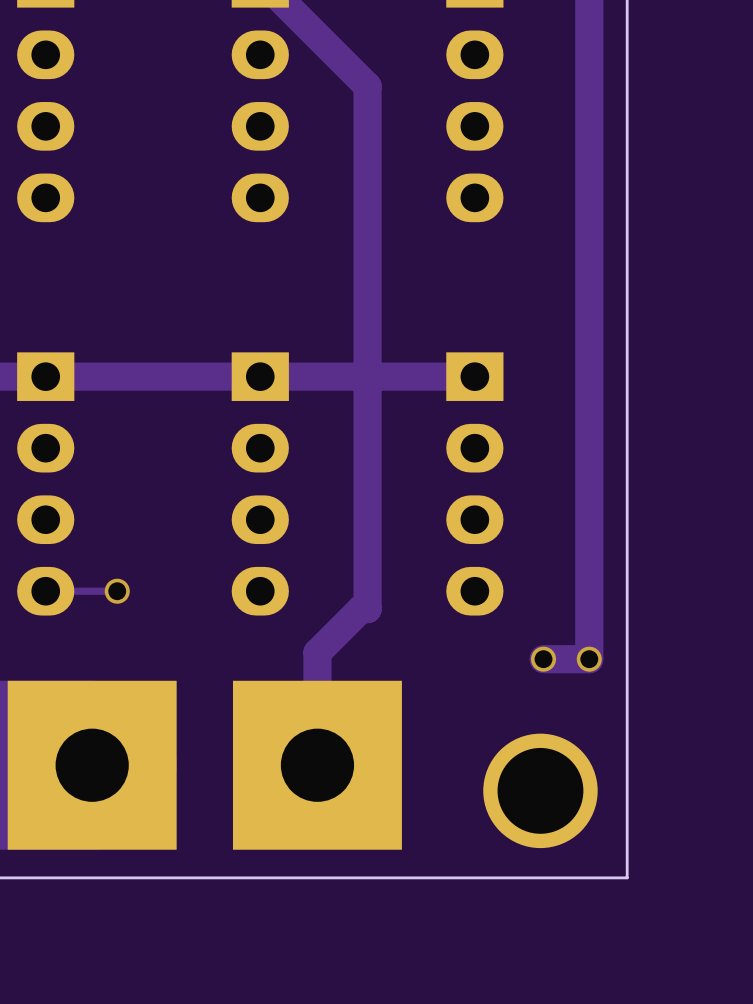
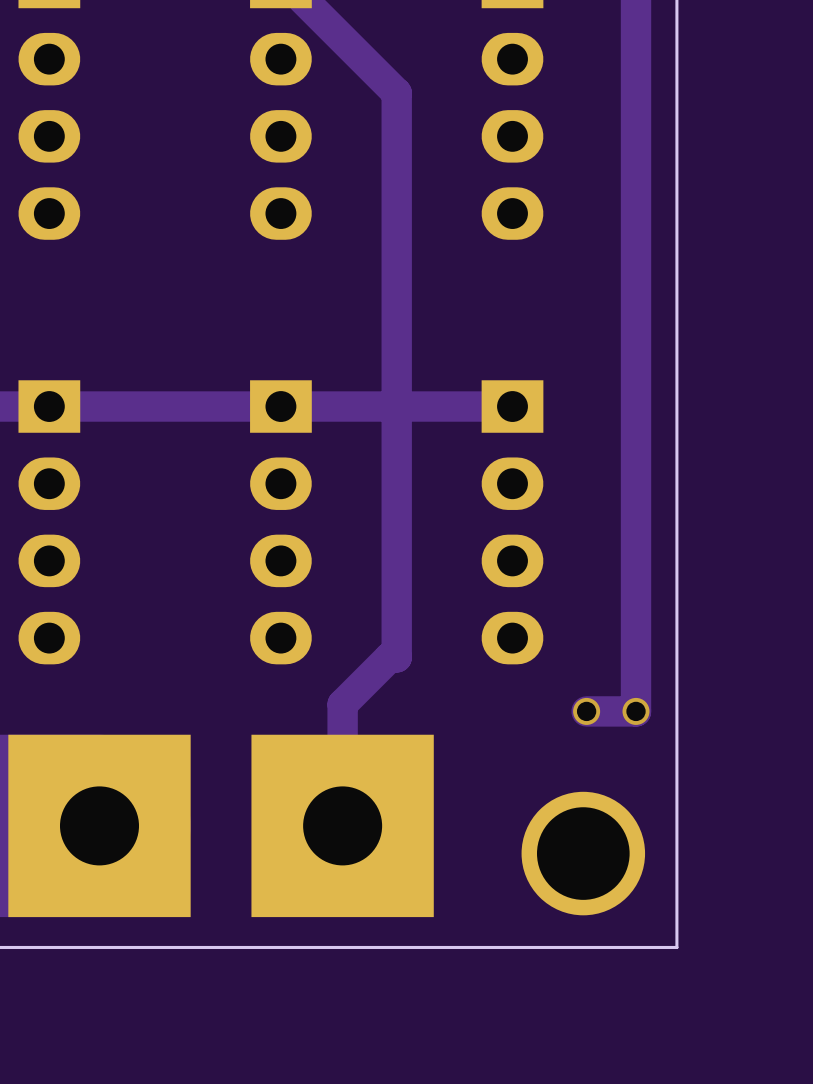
track: (117, 591) (45, 591) -> none
via: (117, 591) -> none

